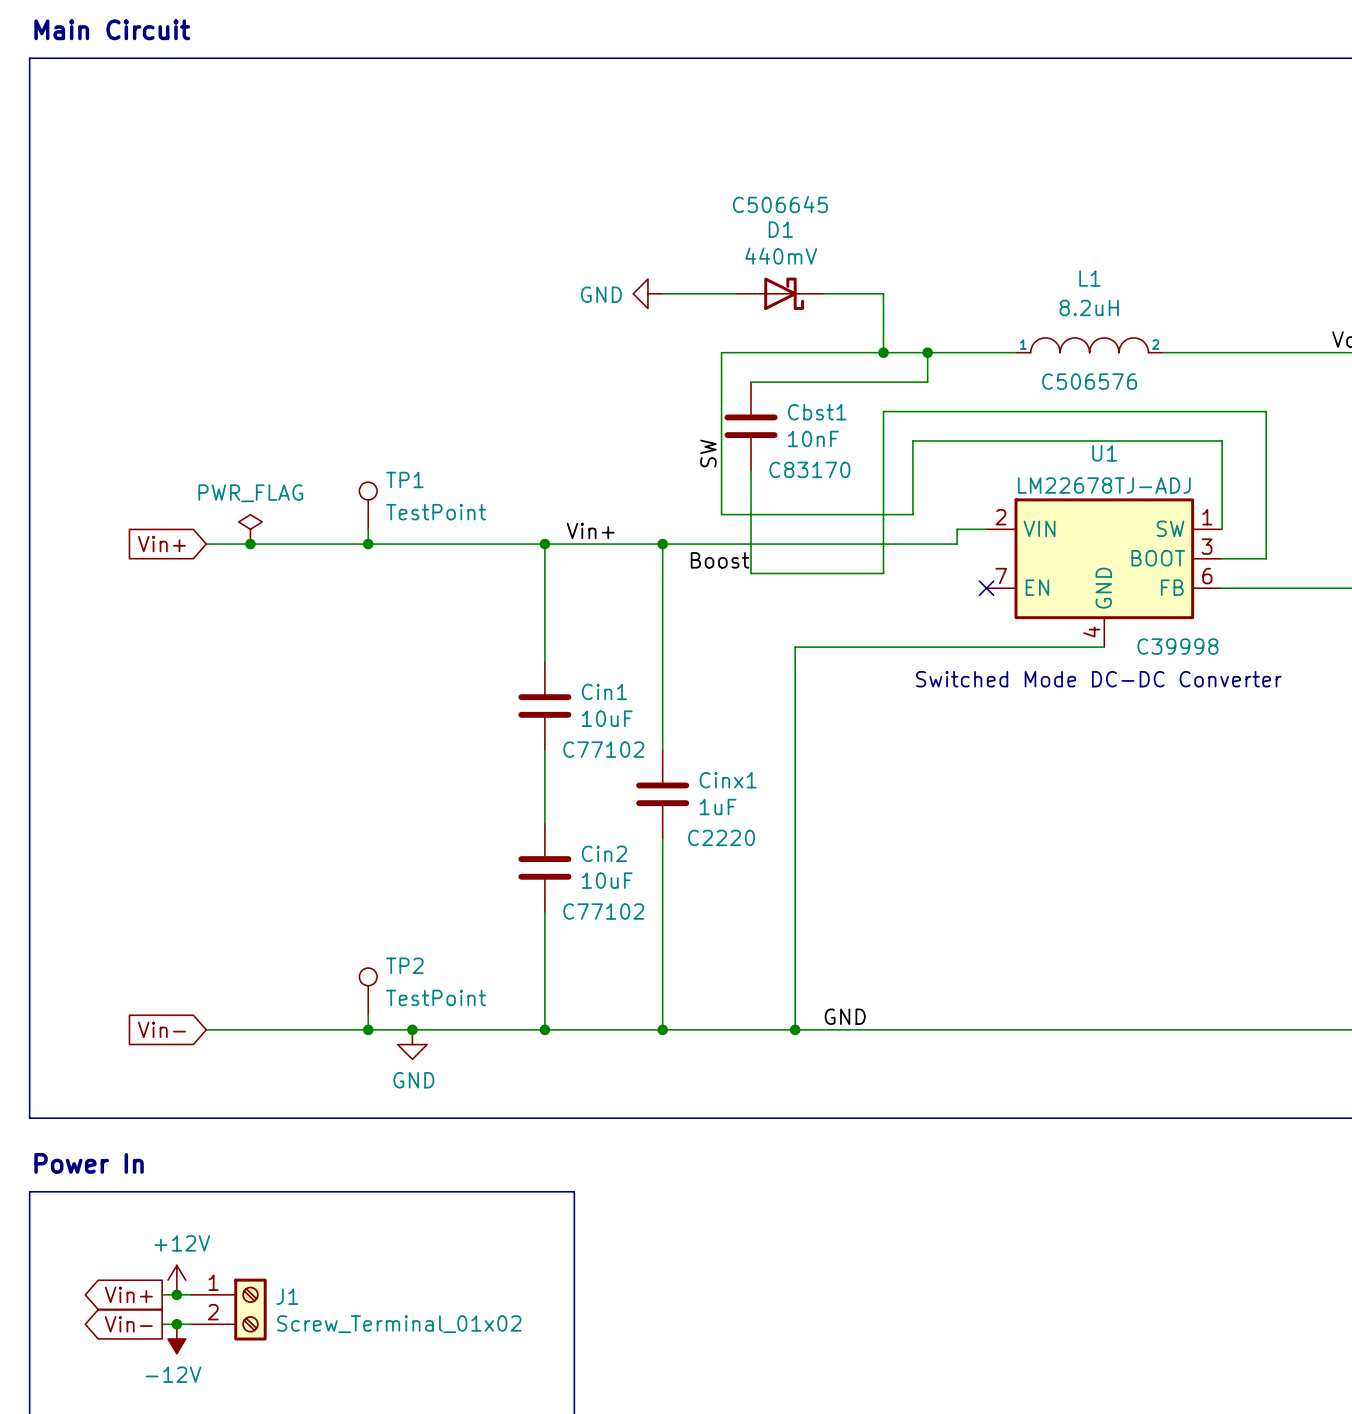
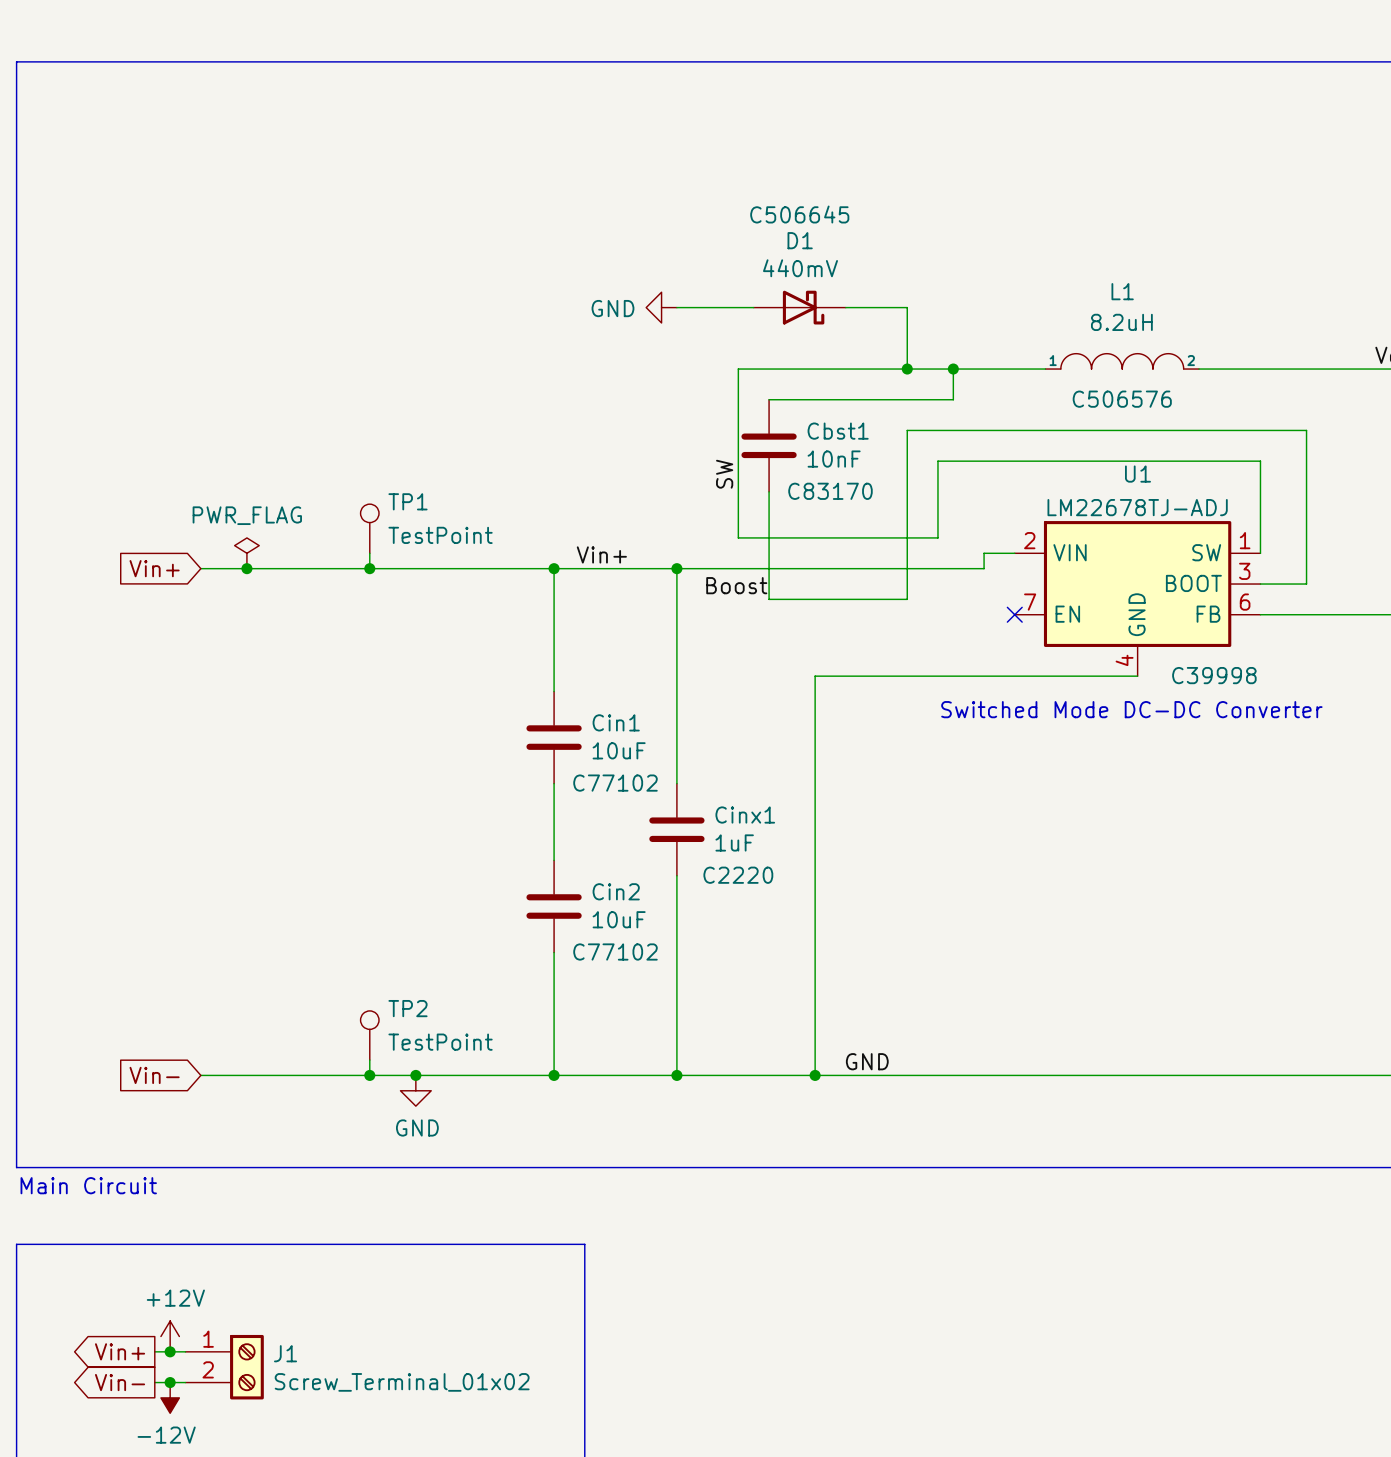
text: Main Circuit (112, 29) -> none
text: none -> Main Circuit (88, 1185)
text: Power In (89, 1163) -> none

